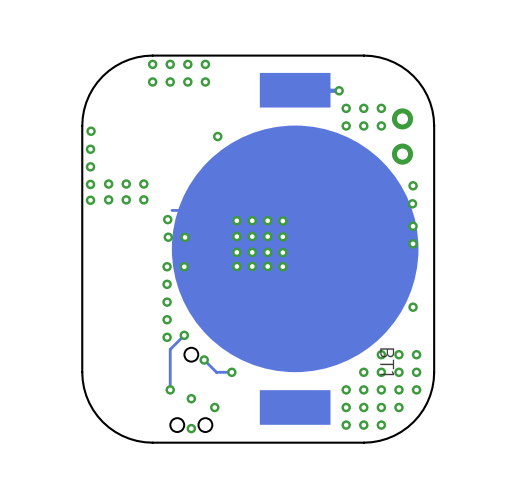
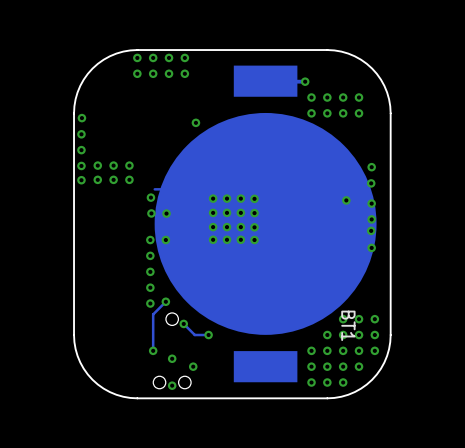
part footprint: [391, 108, 414, 165] -> [354, 109, 364, 118]
part: none -> (359, 97)
part: none -> (346, 200)
part: none -> (371, 230)
part: none -> (371, 247)
part: (413, 307) -> none

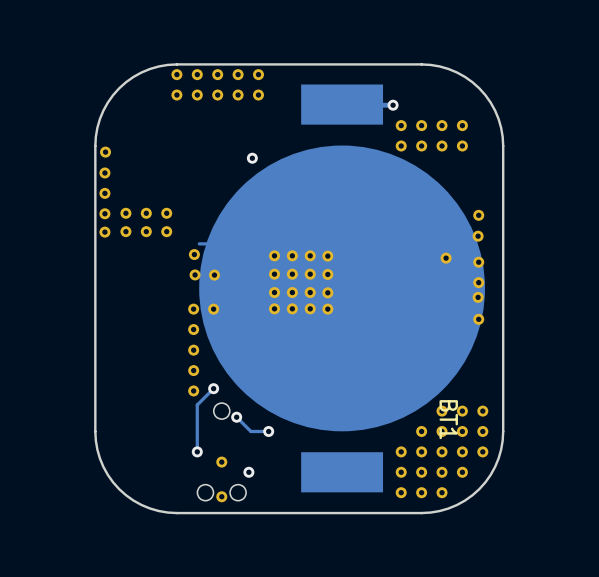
part: none -> (258, 74)
part: none -> (258, 95)

